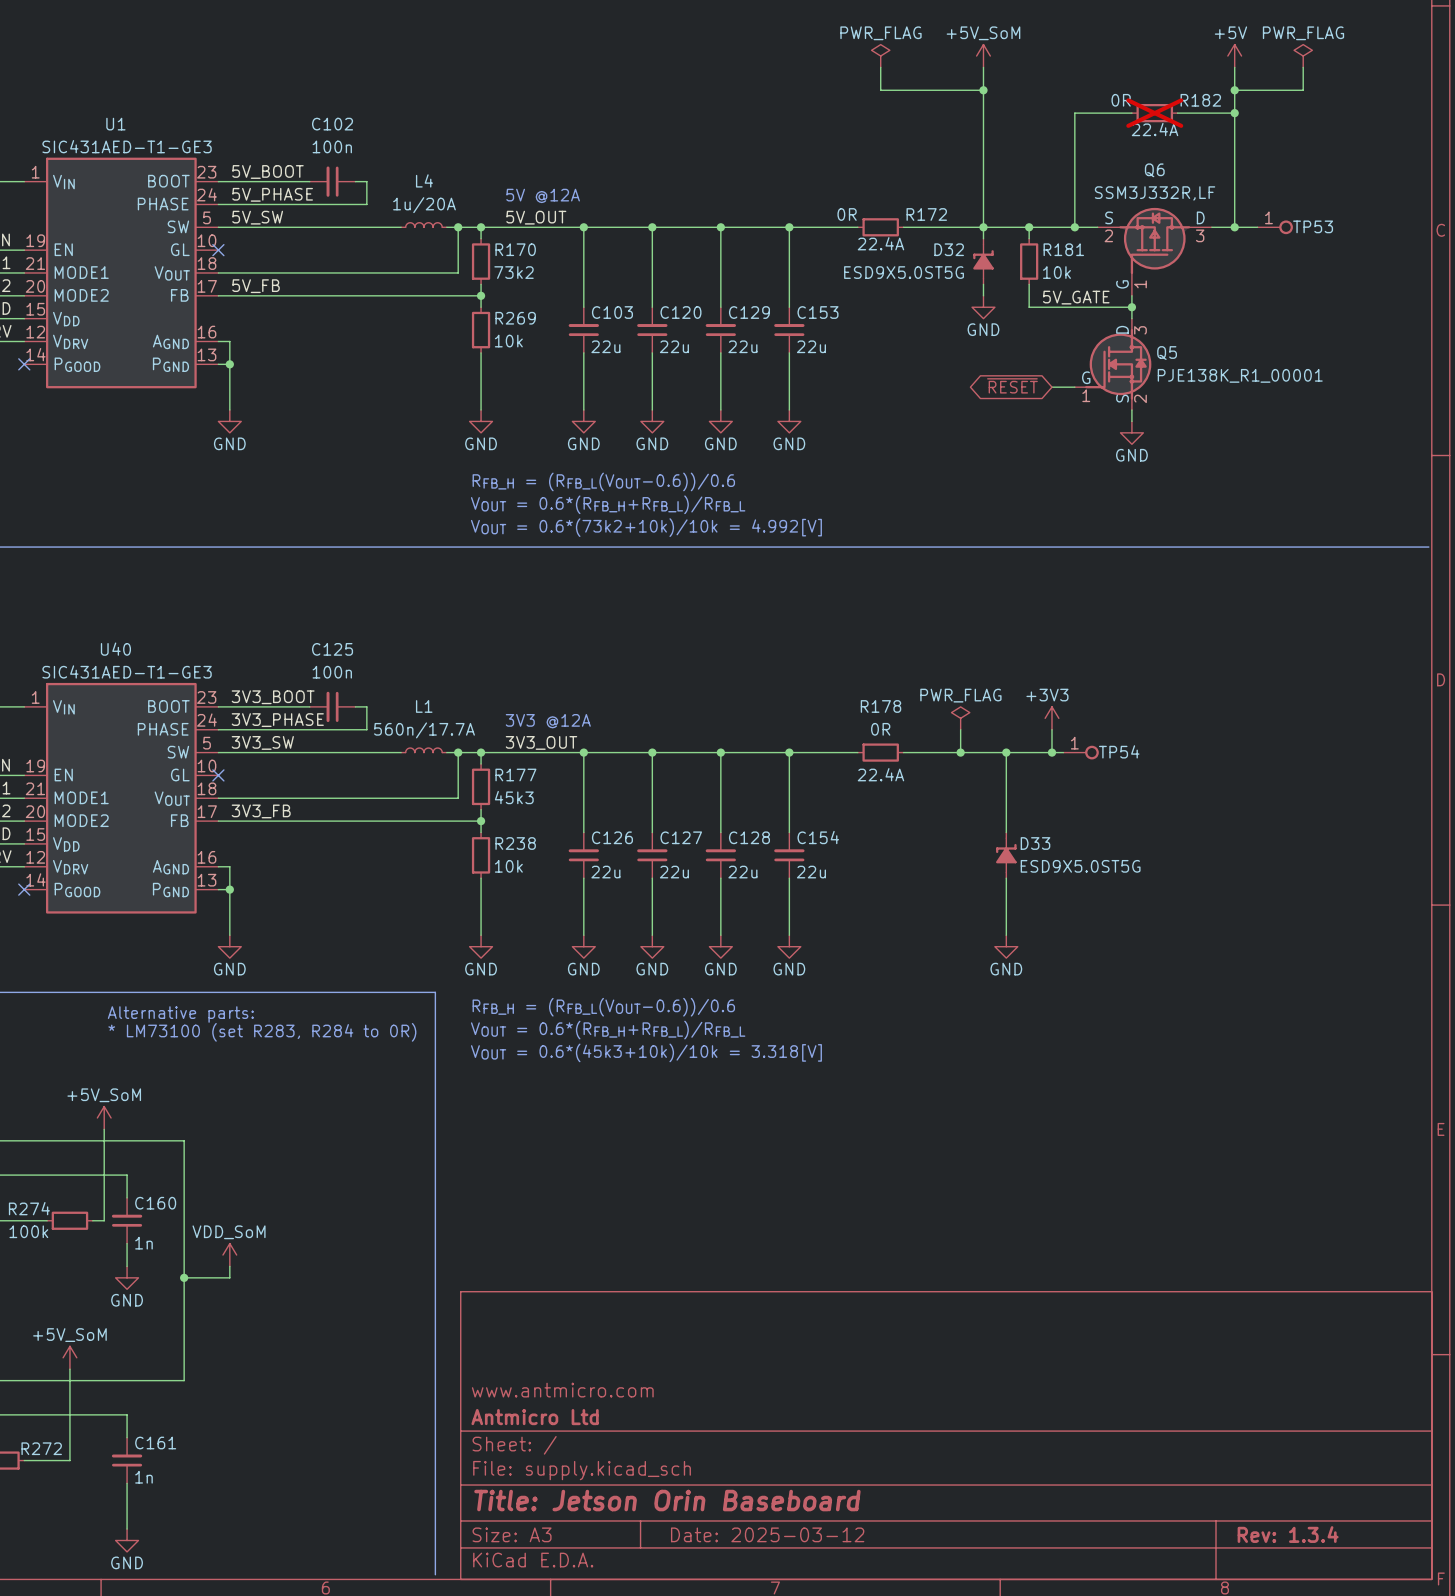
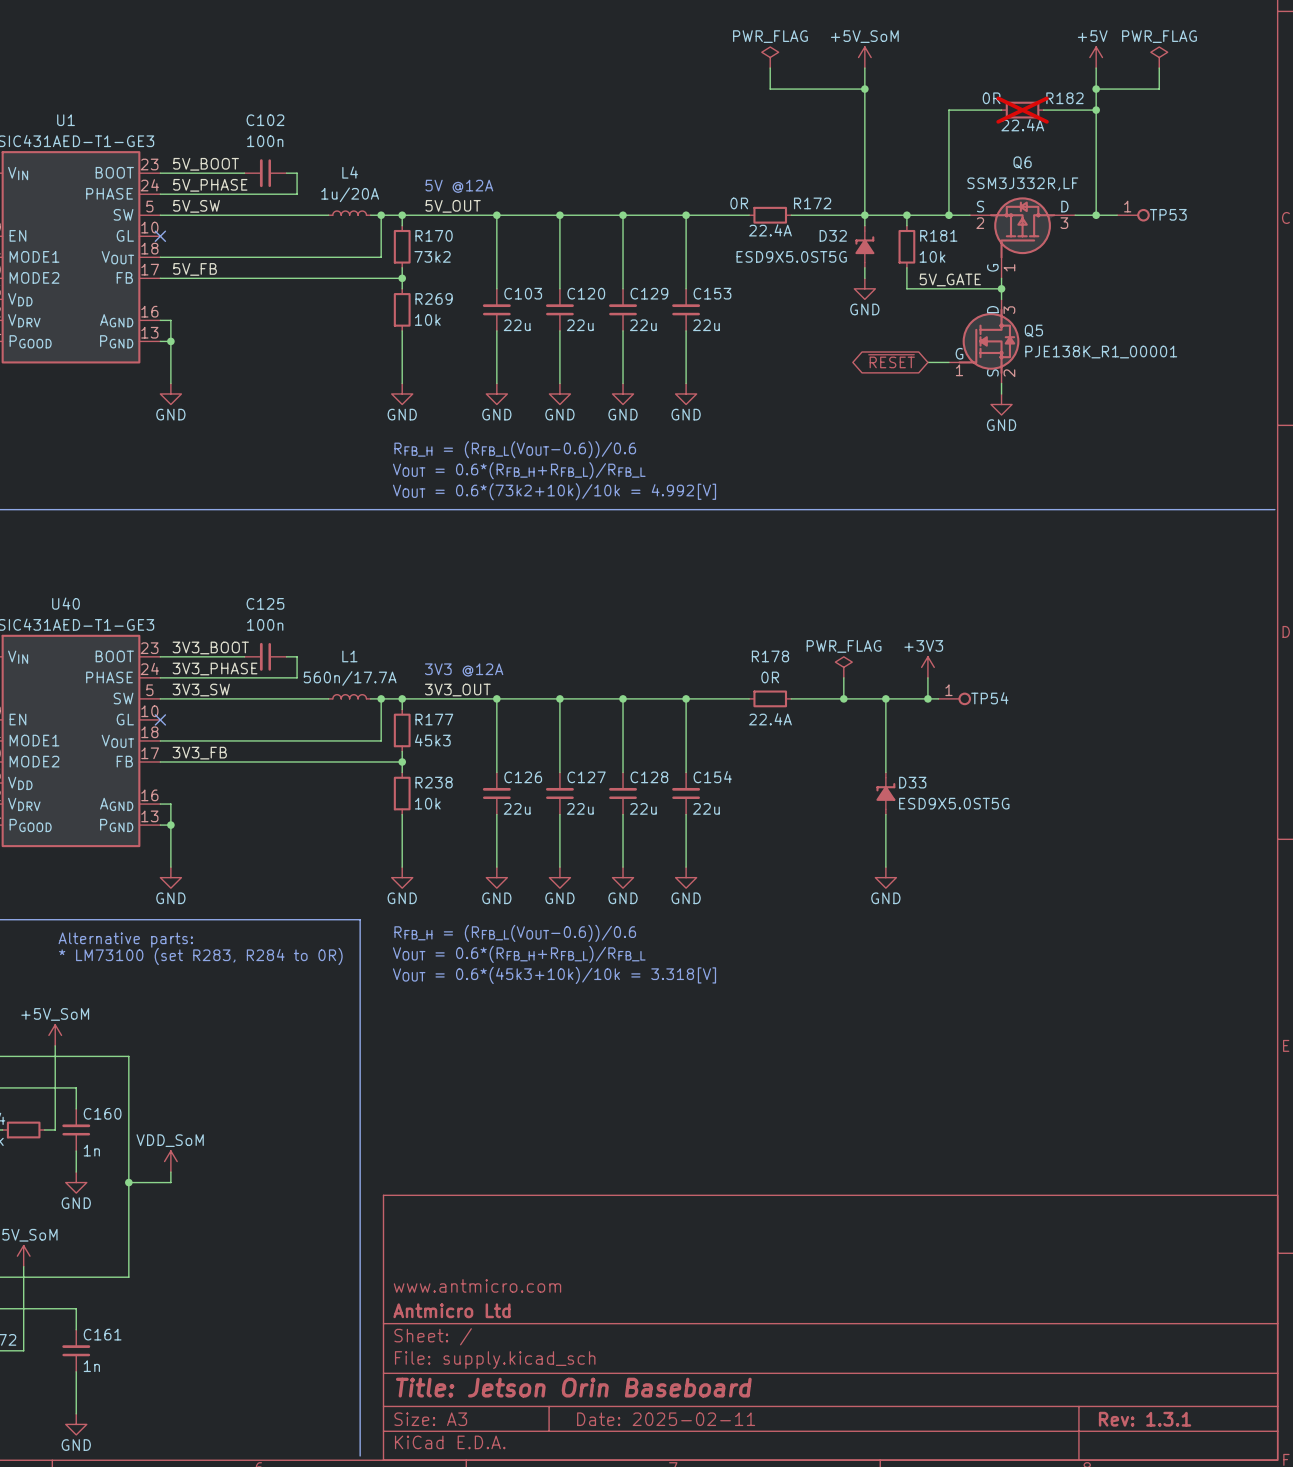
title block: Date: 2025-03-12 (767, 1534) -> Date: 2025-02-11 (666, 1419)
title block: Rev: 1.3.4 (1288, 1534) -> Rev: 1.3.1 (1145, 1419)

